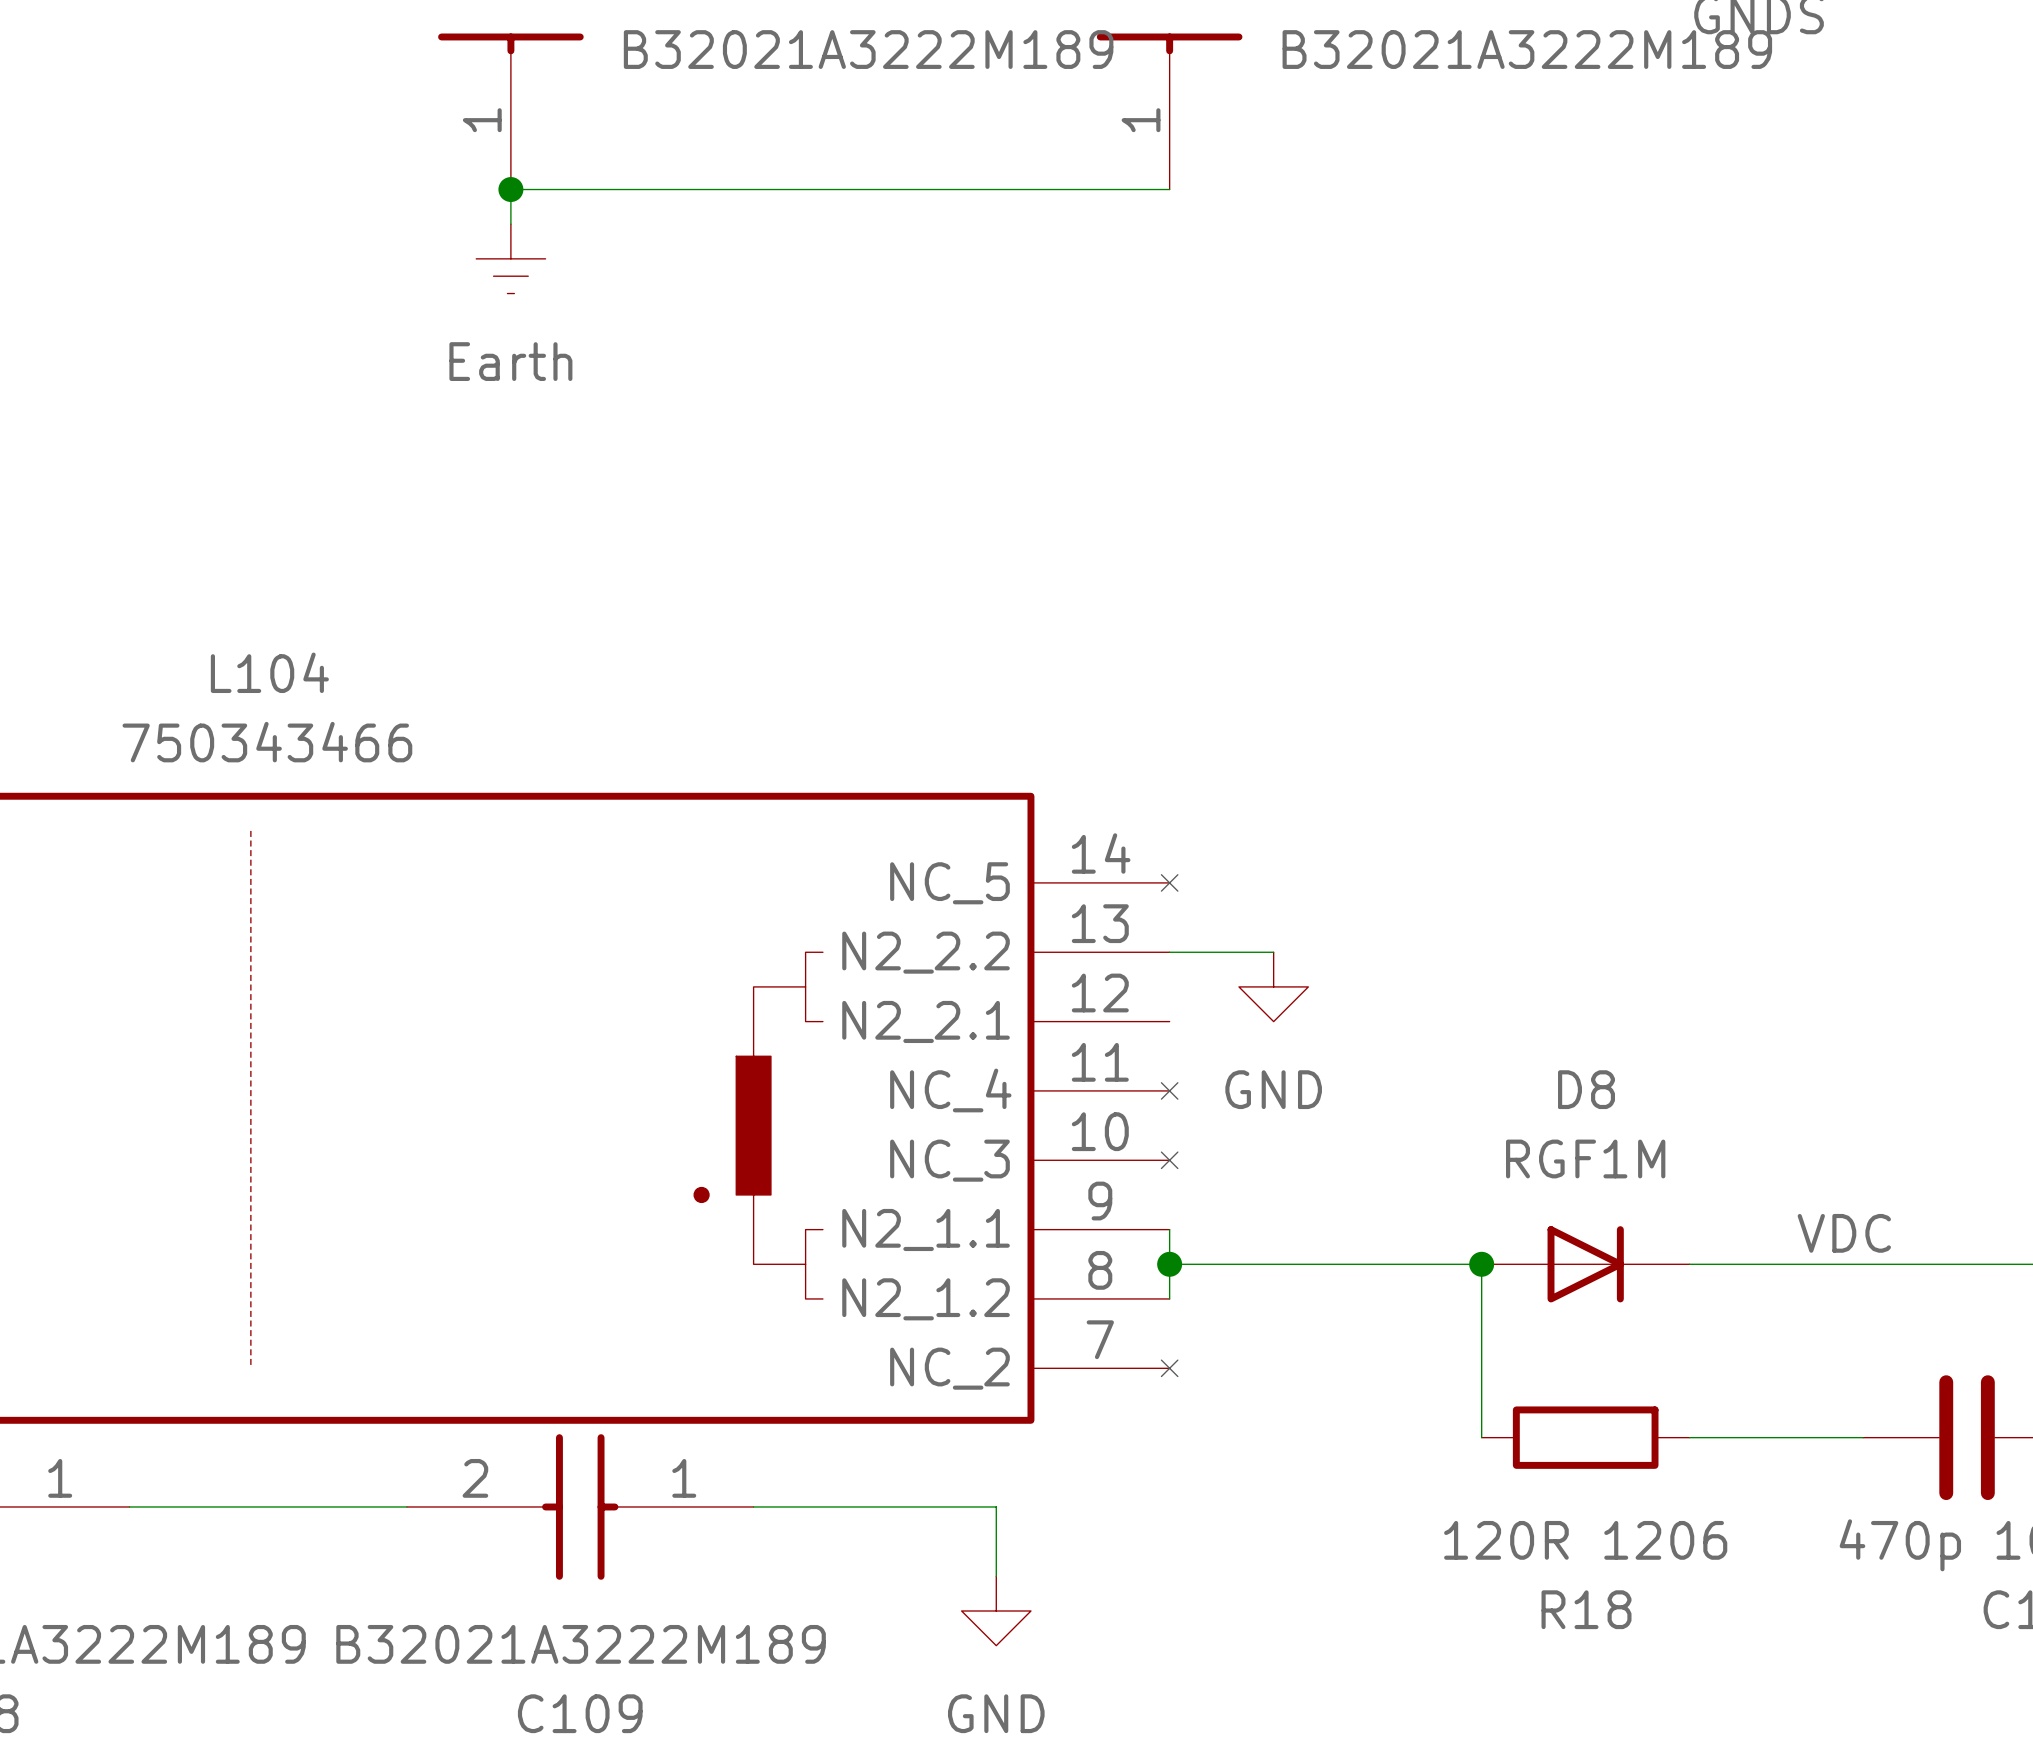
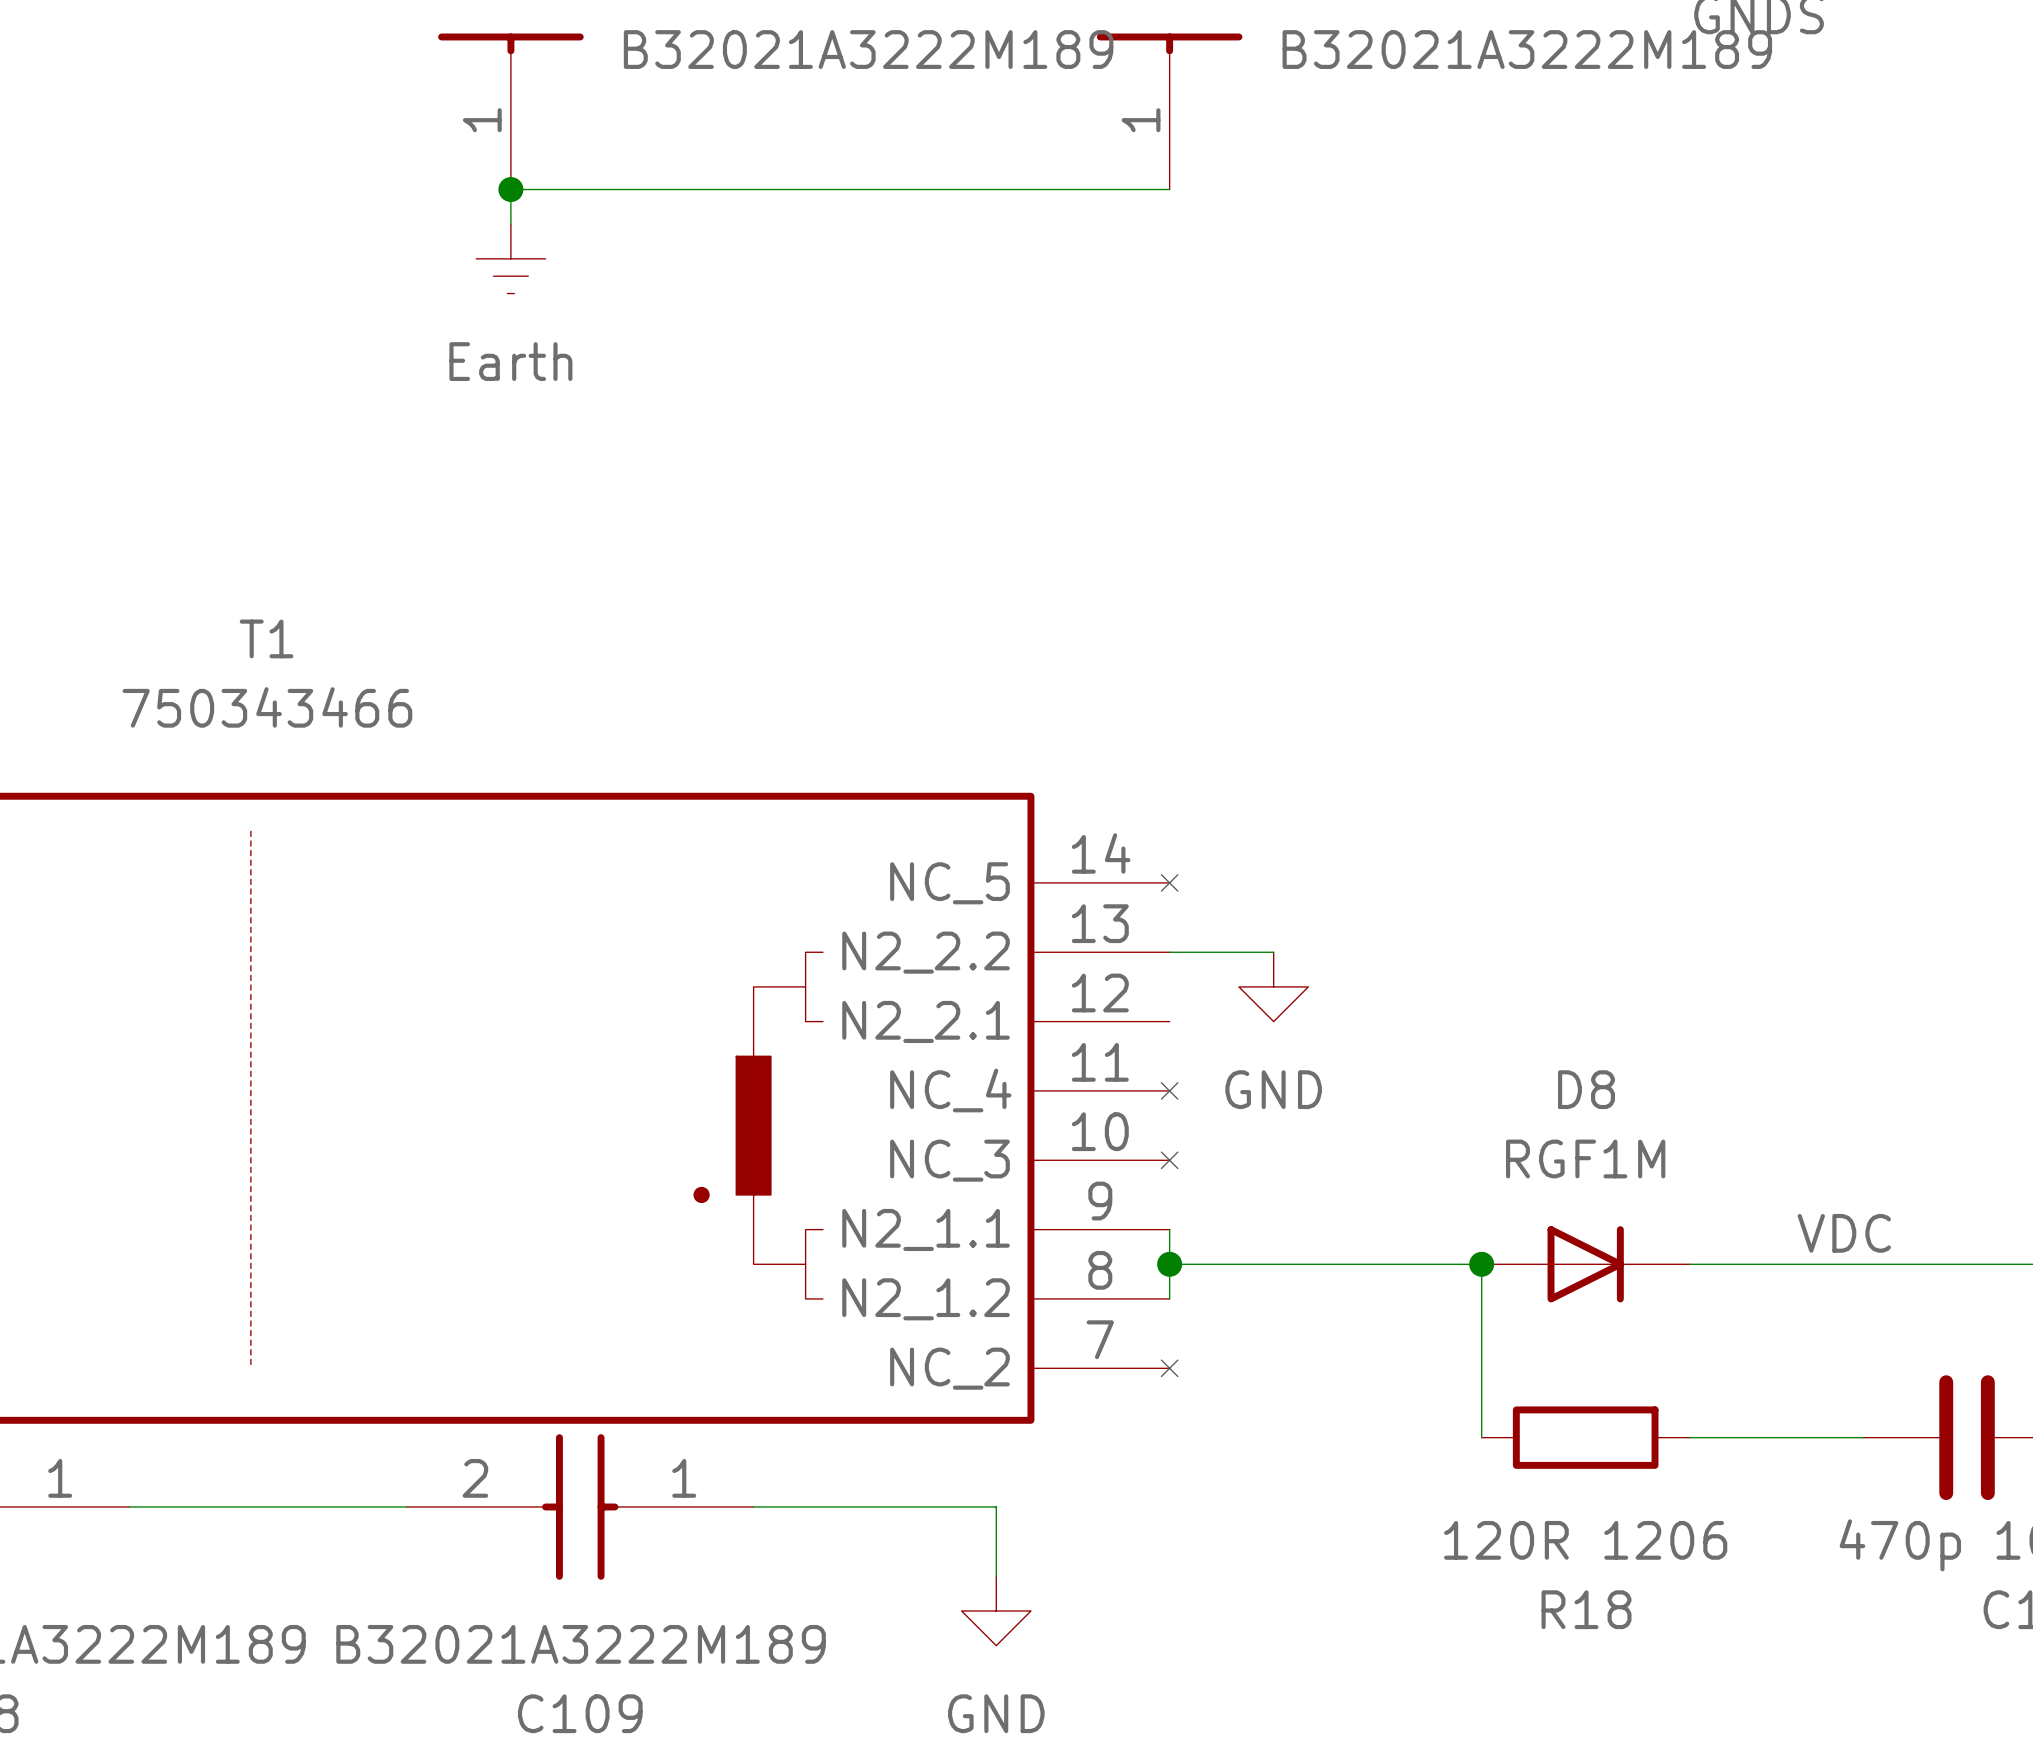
L104 name: L104 (269, 672) -> T1 (266, 638)
L104 value position: 750343466 (267, 742) -> 750343466 (267, 707)

